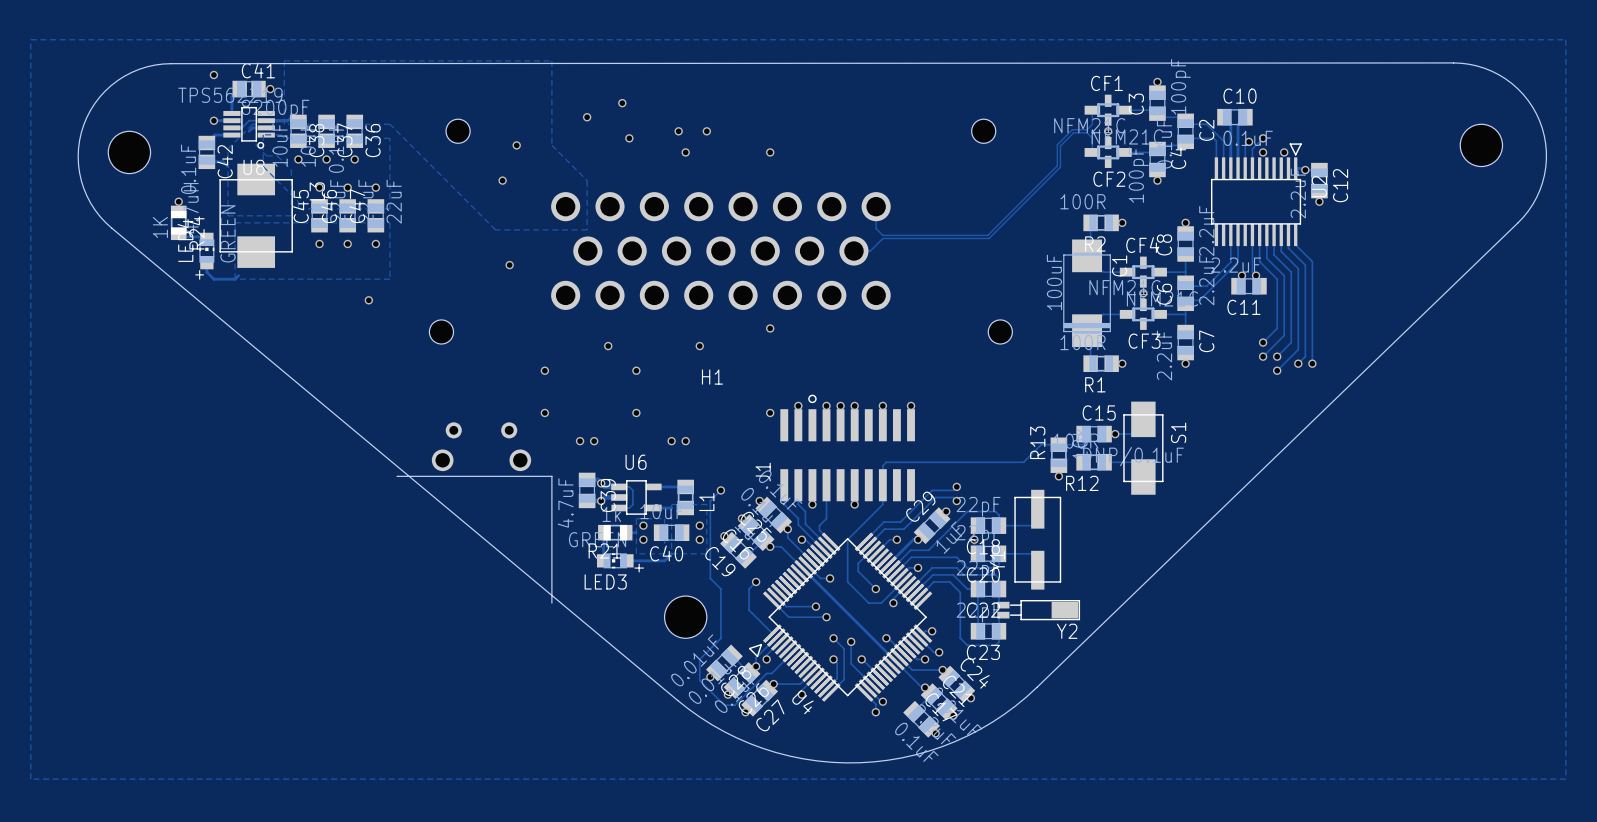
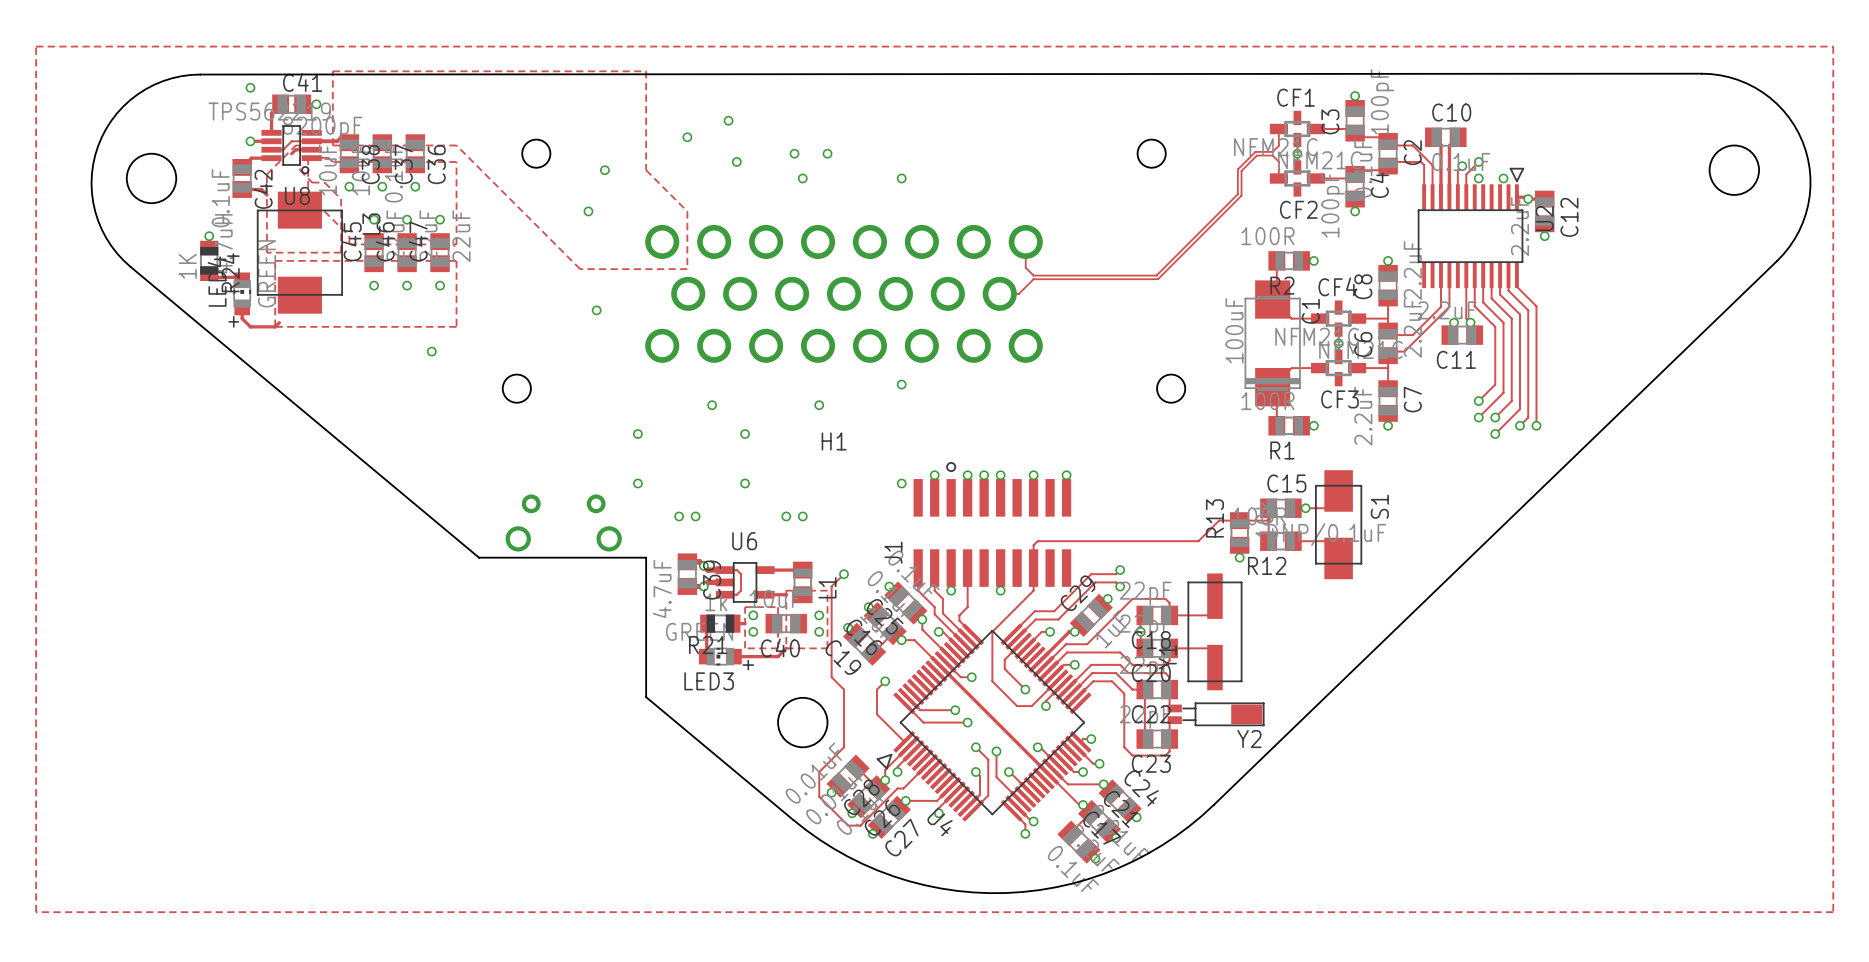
board edge: (396, 476) (409, 476) (551, 595) (551, 603) -> none

